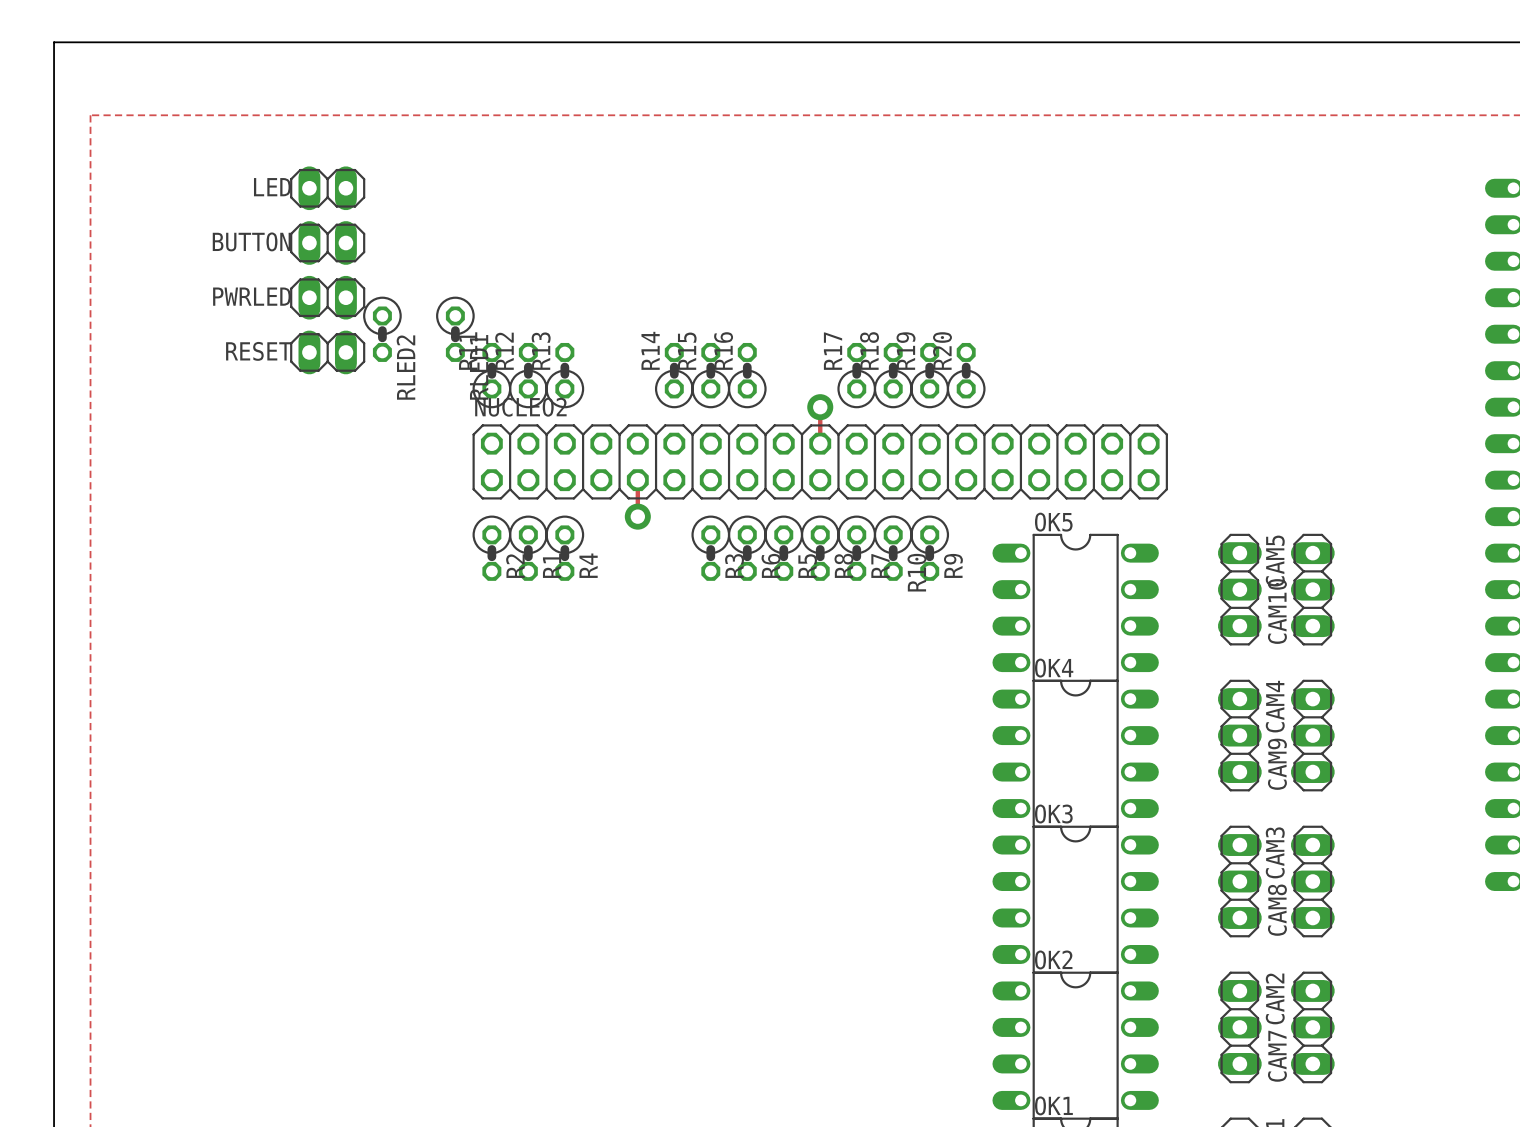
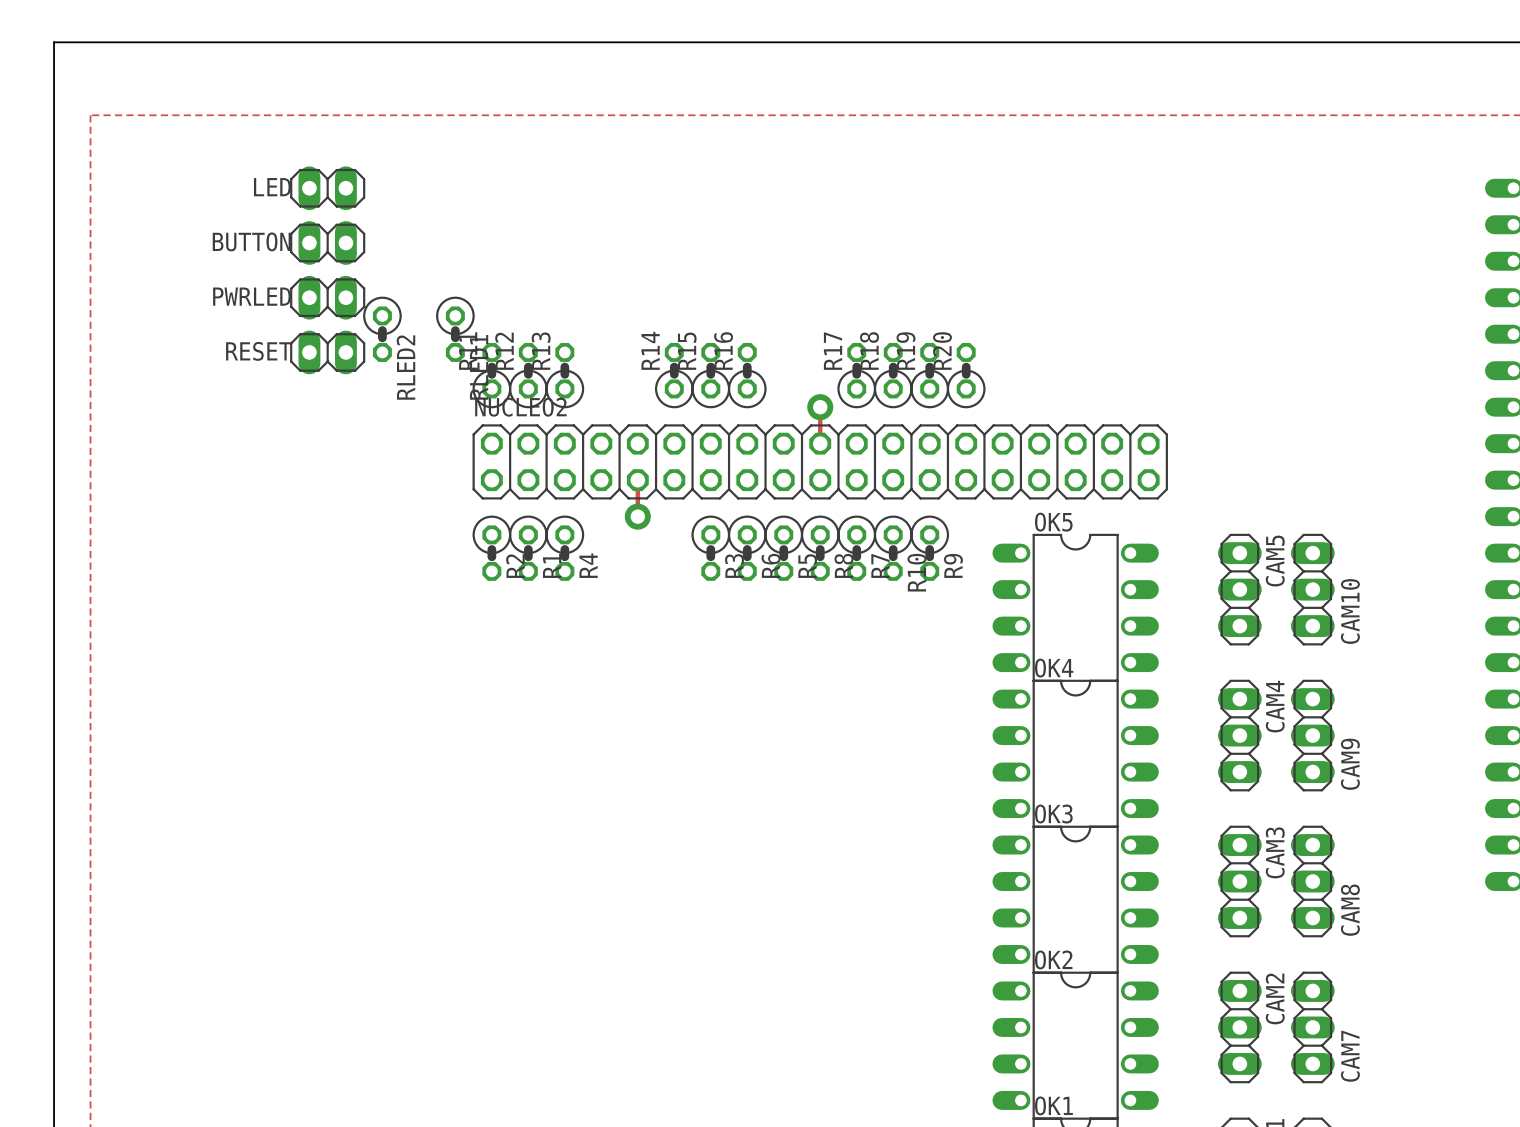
CAM10 name position: CAM10 (1277, 611) -> CAM10 (1350, 611)
CAM9 name position: CAM9 (1277, 764) -> CAM9 (1350, 764)
CAM8 name position: CAM8 (1277, 910) -> CAM8 (1350, 910)
CAM7 name position: CAM7 (1277, 1056) -> CAM7 (1350, 1056)

